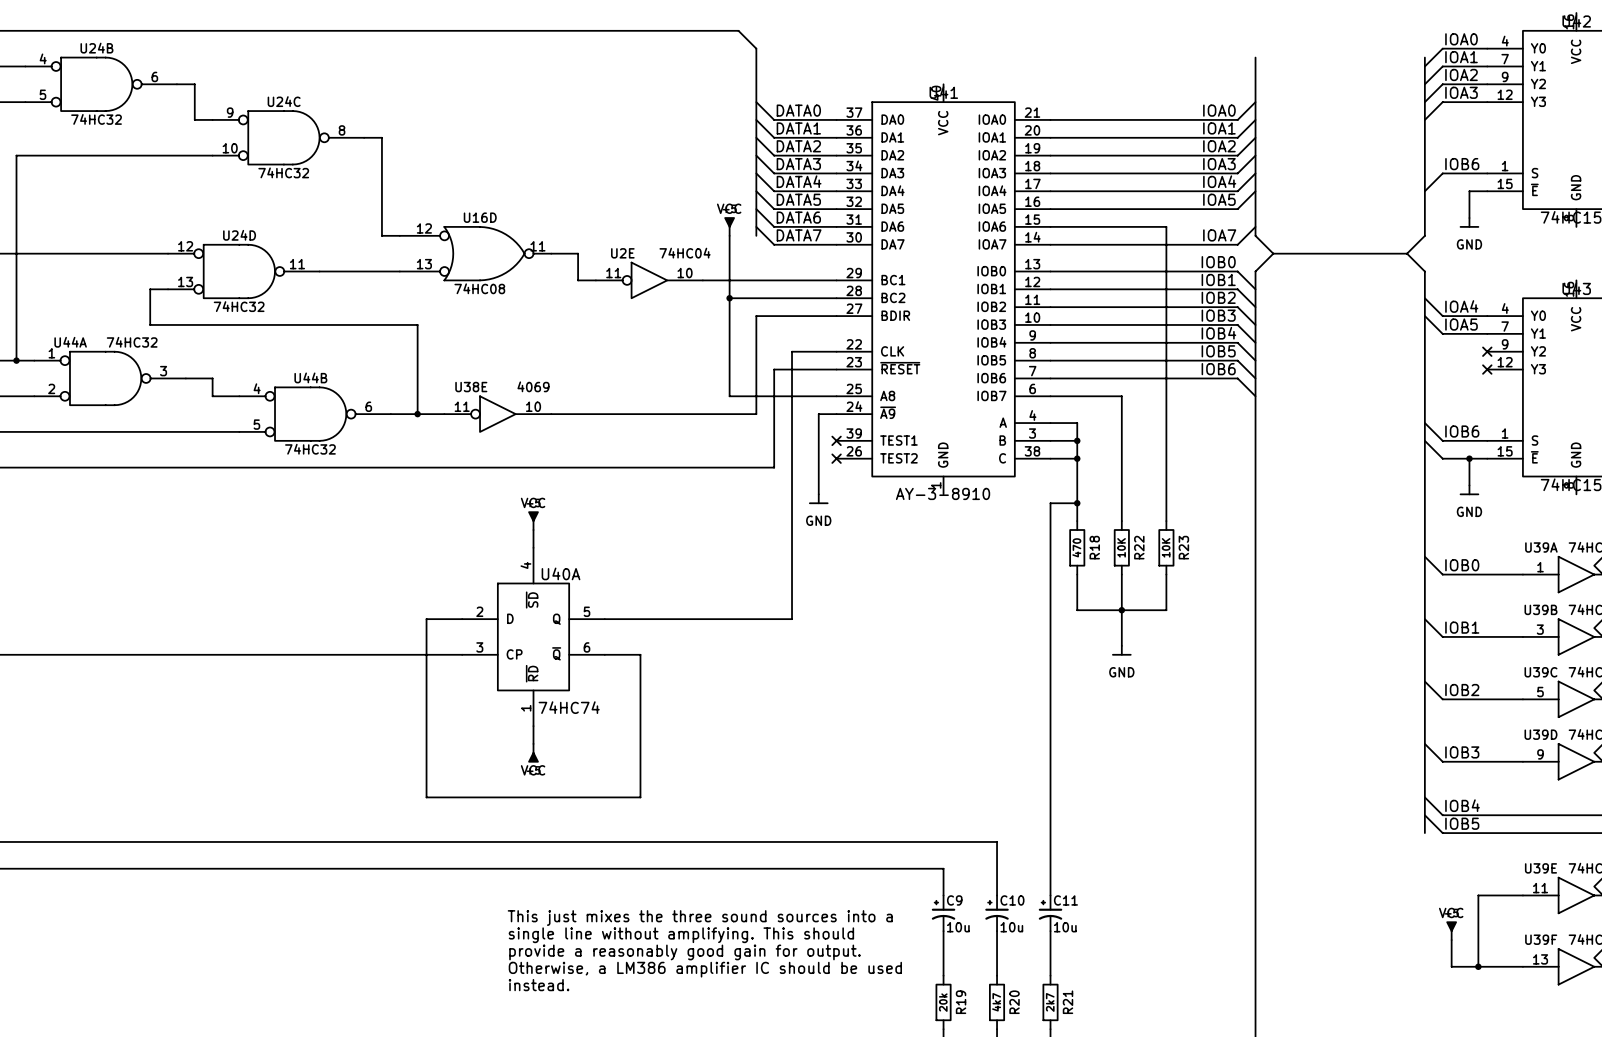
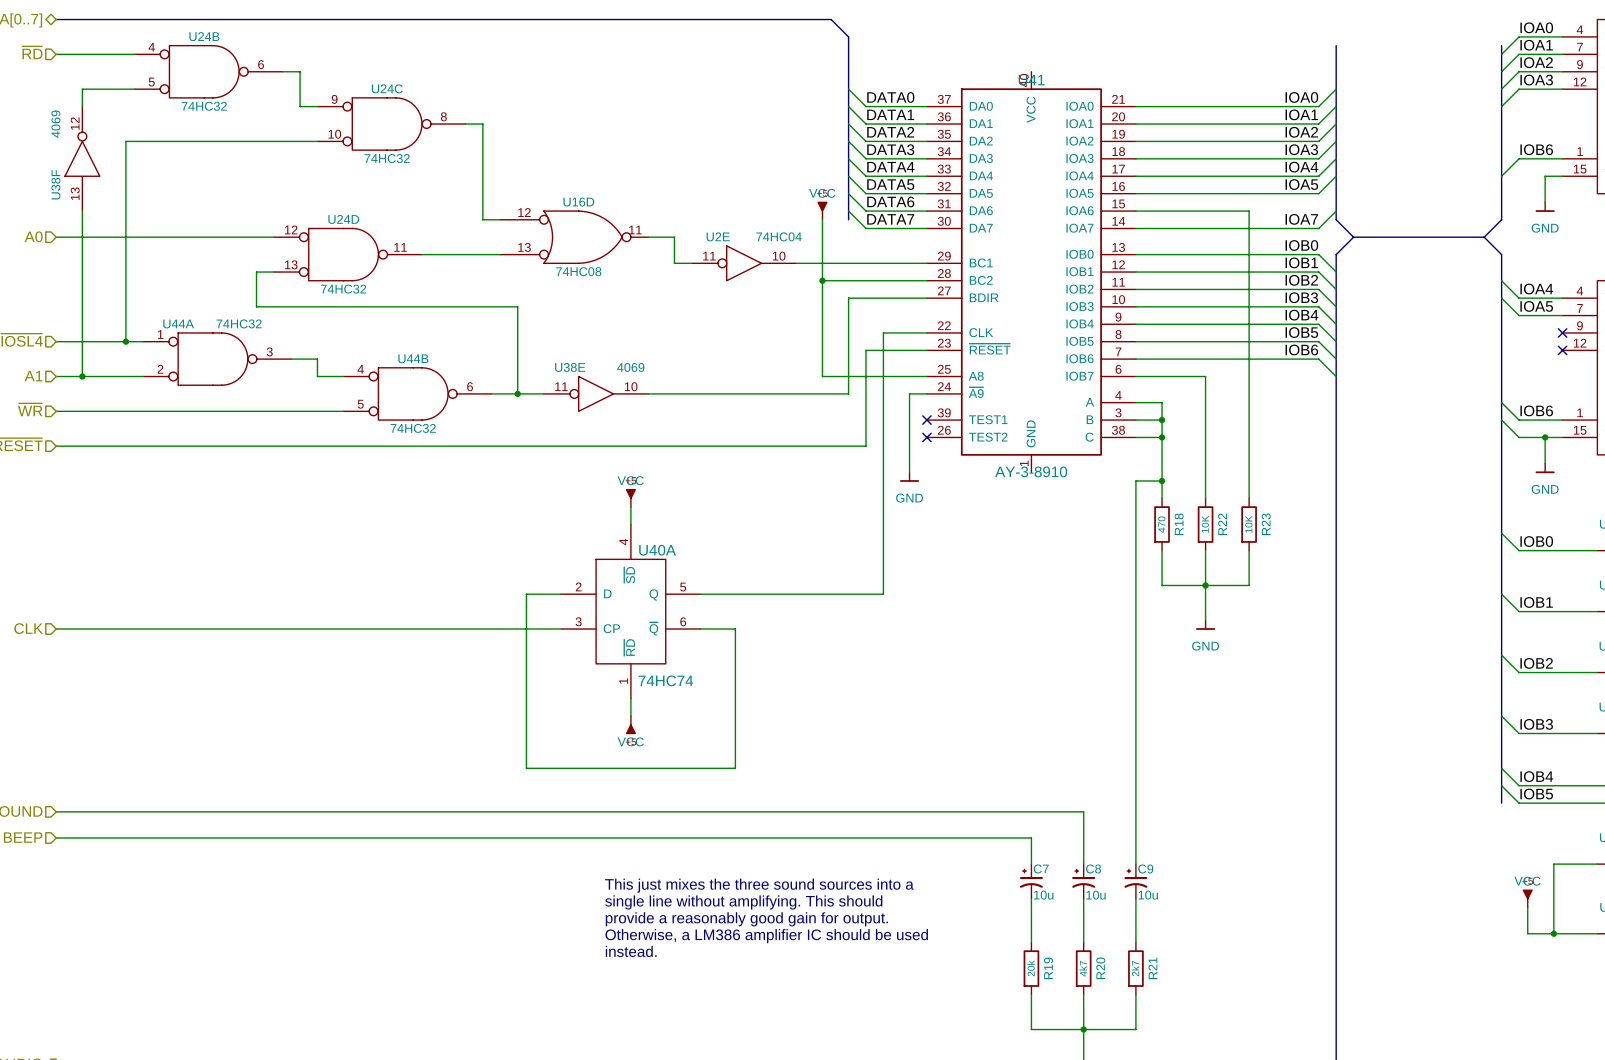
C9 name: C9 (954, 900) -> C7 (1041, 868)
C10 name: C10 (1012, 900) -> C8 (1093, 868)
C11 name: C11 (1065, 900) -> C9 (1145, 868)

